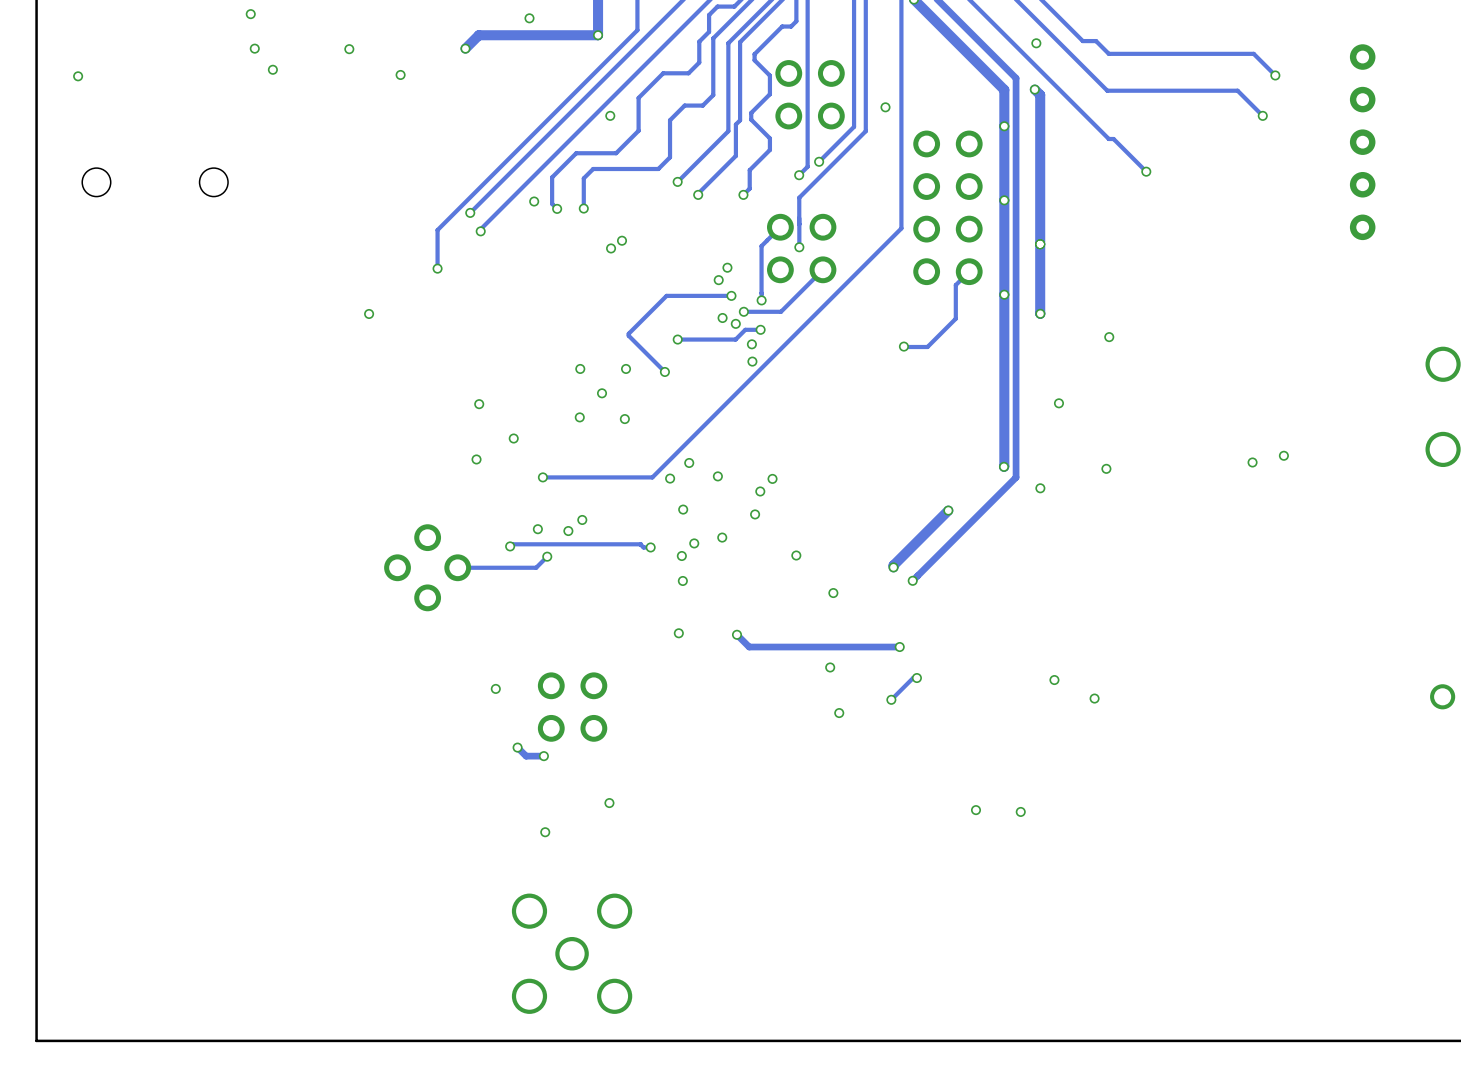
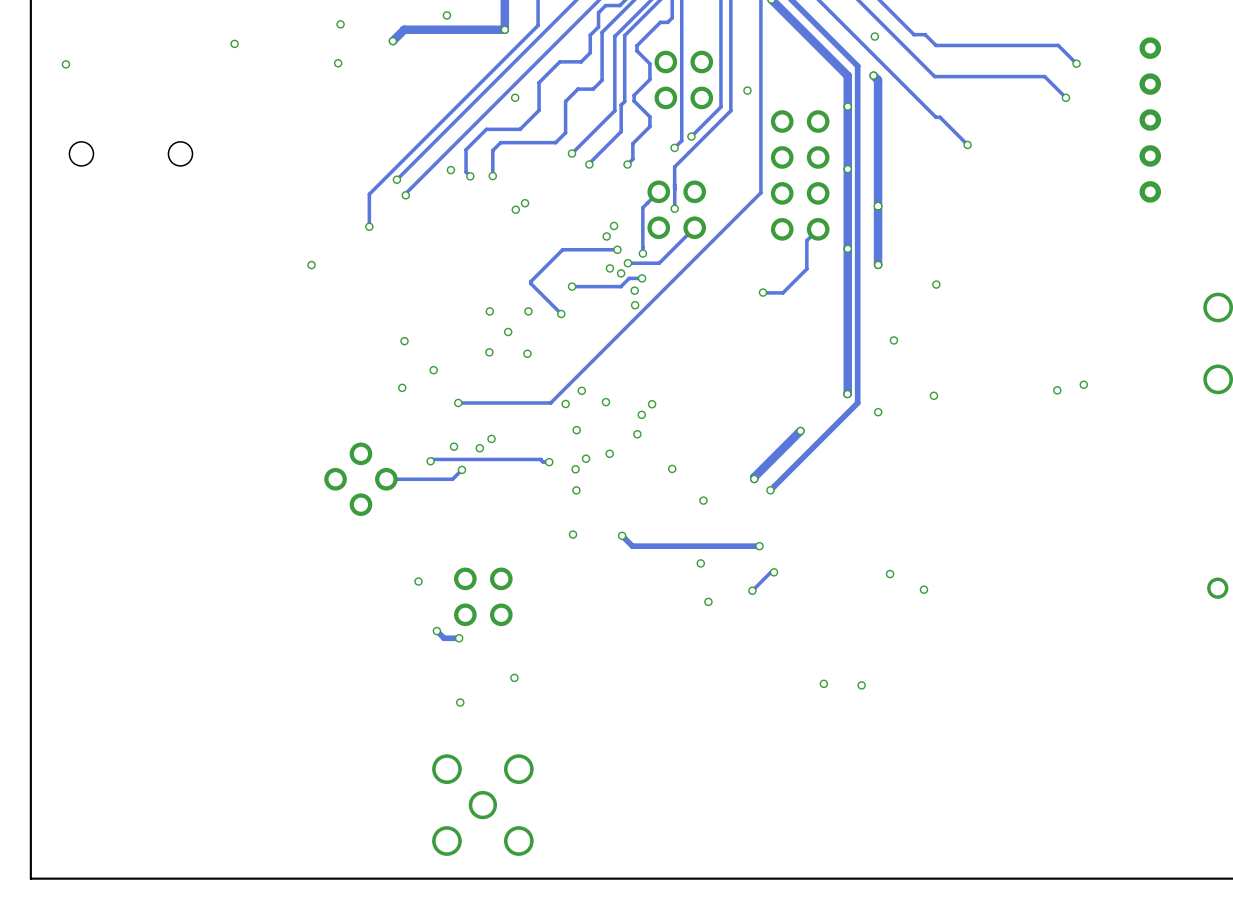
via: (250, 14) -> none
via: none -> (340, 24)
via: (254, 48) -> none
via: (349, 49) -> none
via: none -> (234, 43)
via: (272, 69) -> none

